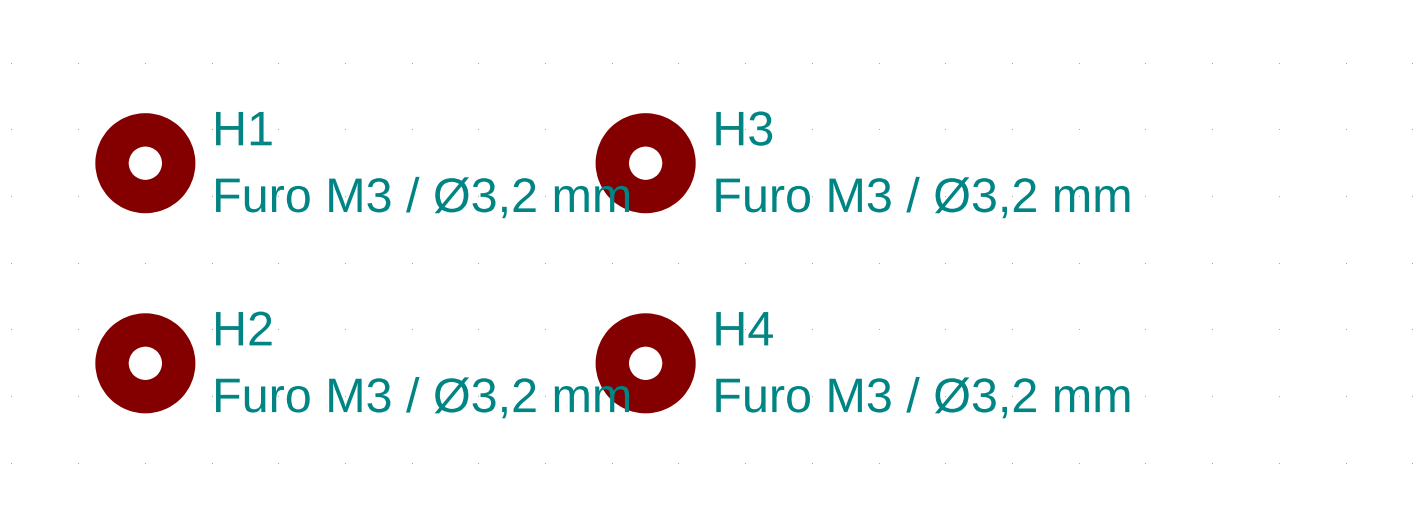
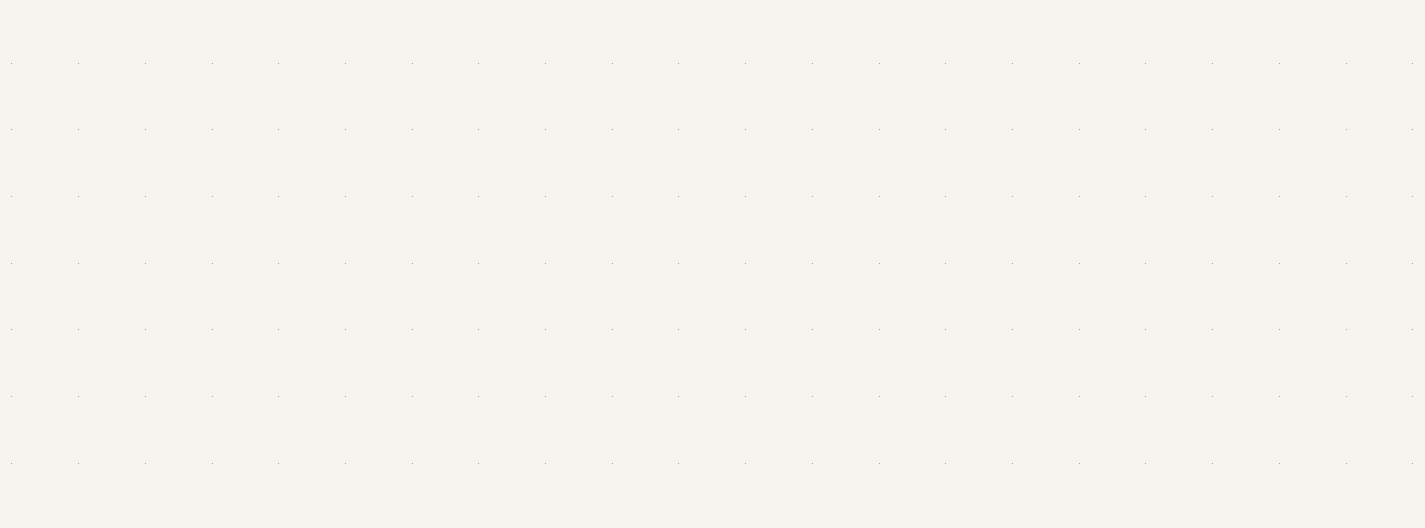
H1: Furo M3 / Ø3,2 mm (145, 163) -> none
H3: Furo M3 / Ø3,2 mm (645, 163) -> none
H2: Furo M3 / Ø3,2 mm (145, 363) -> none
H4: Furo M3 / Ø3,2 mm (645, 363) -> none

